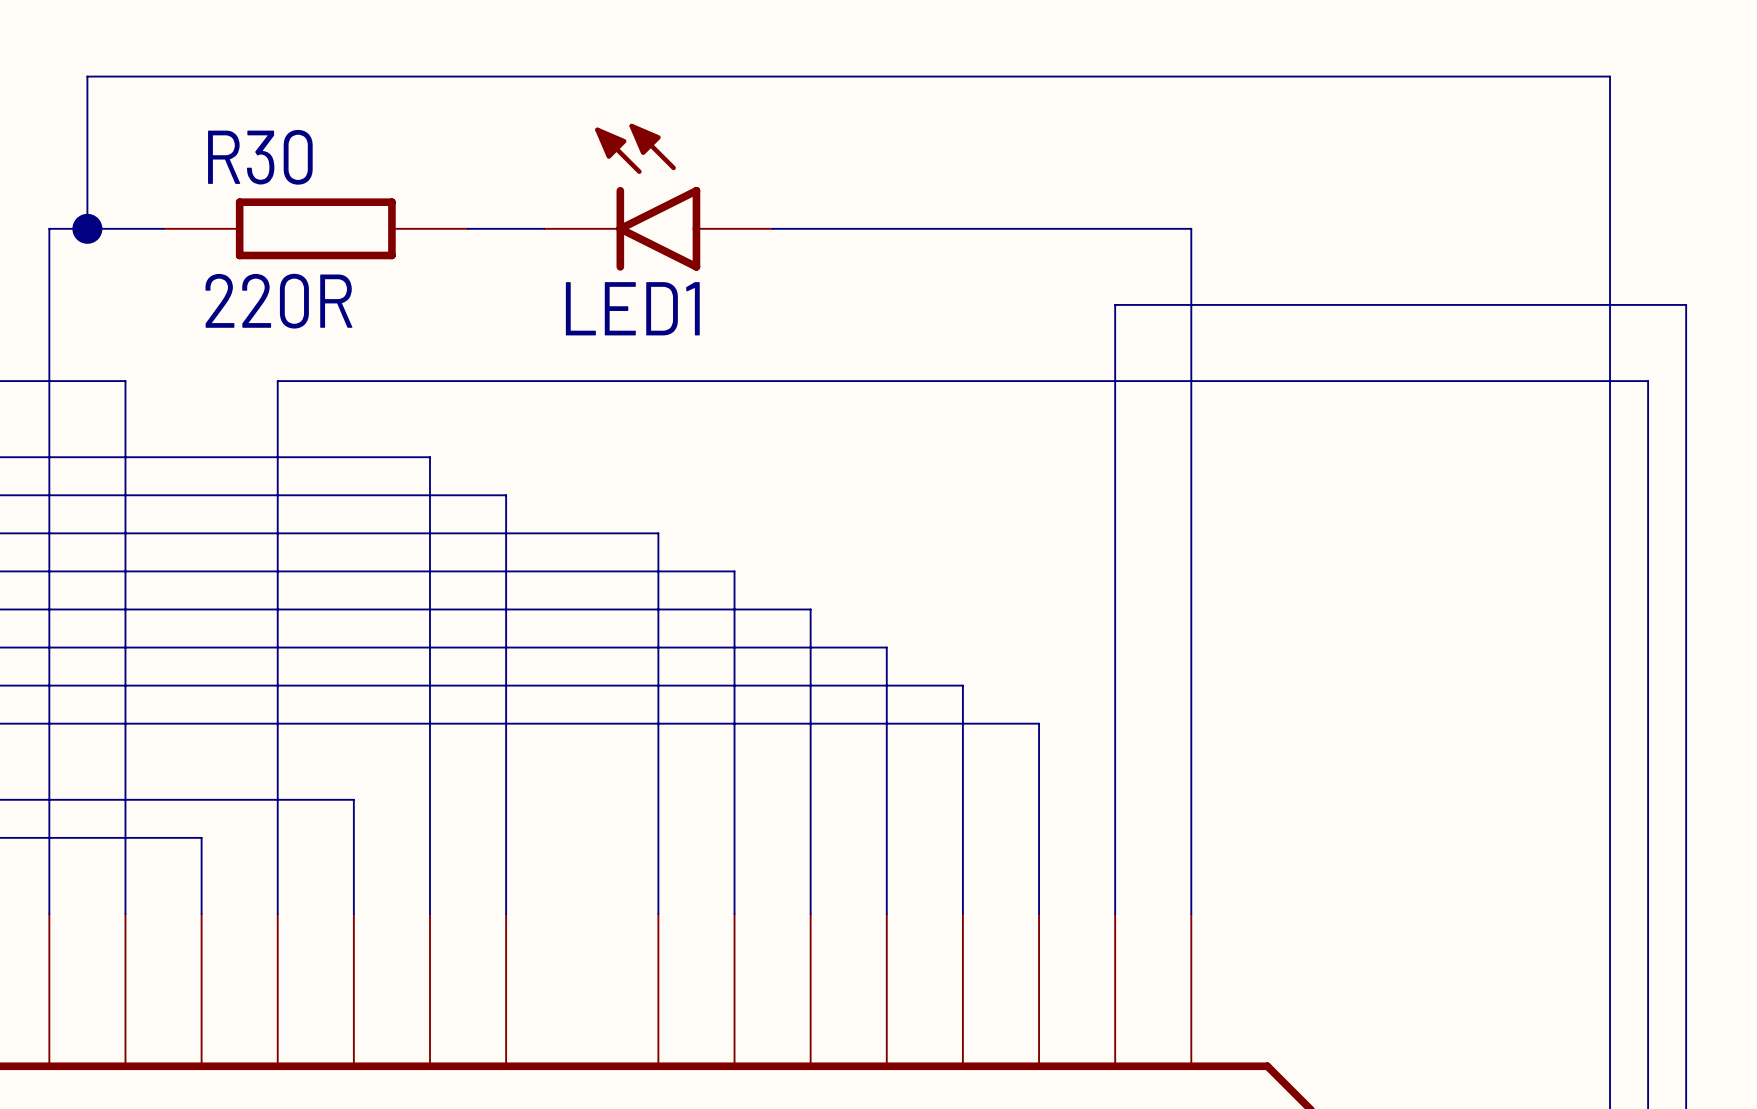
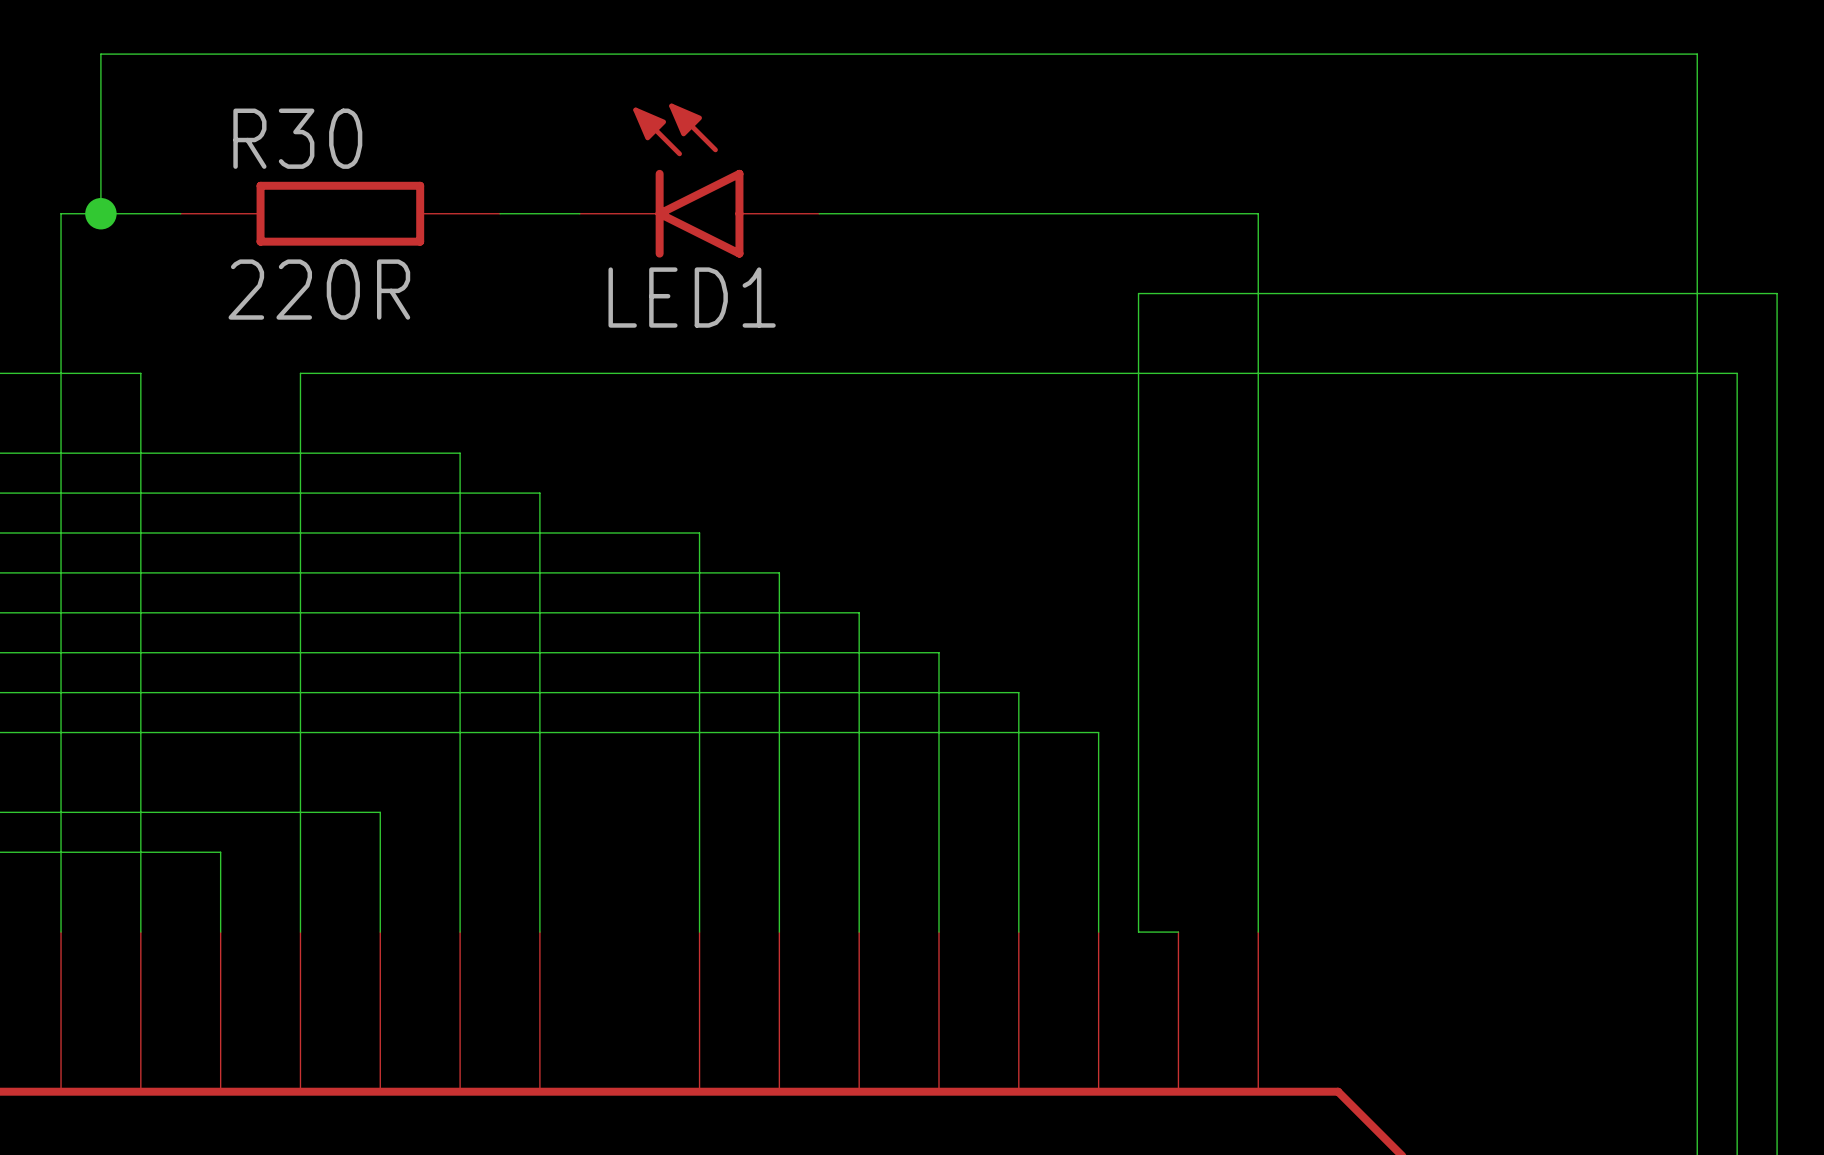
wire: (1115, 304) (1115, 914) -> (1178, 293) (1138, 293) (1138, 932) (1178, 932)

